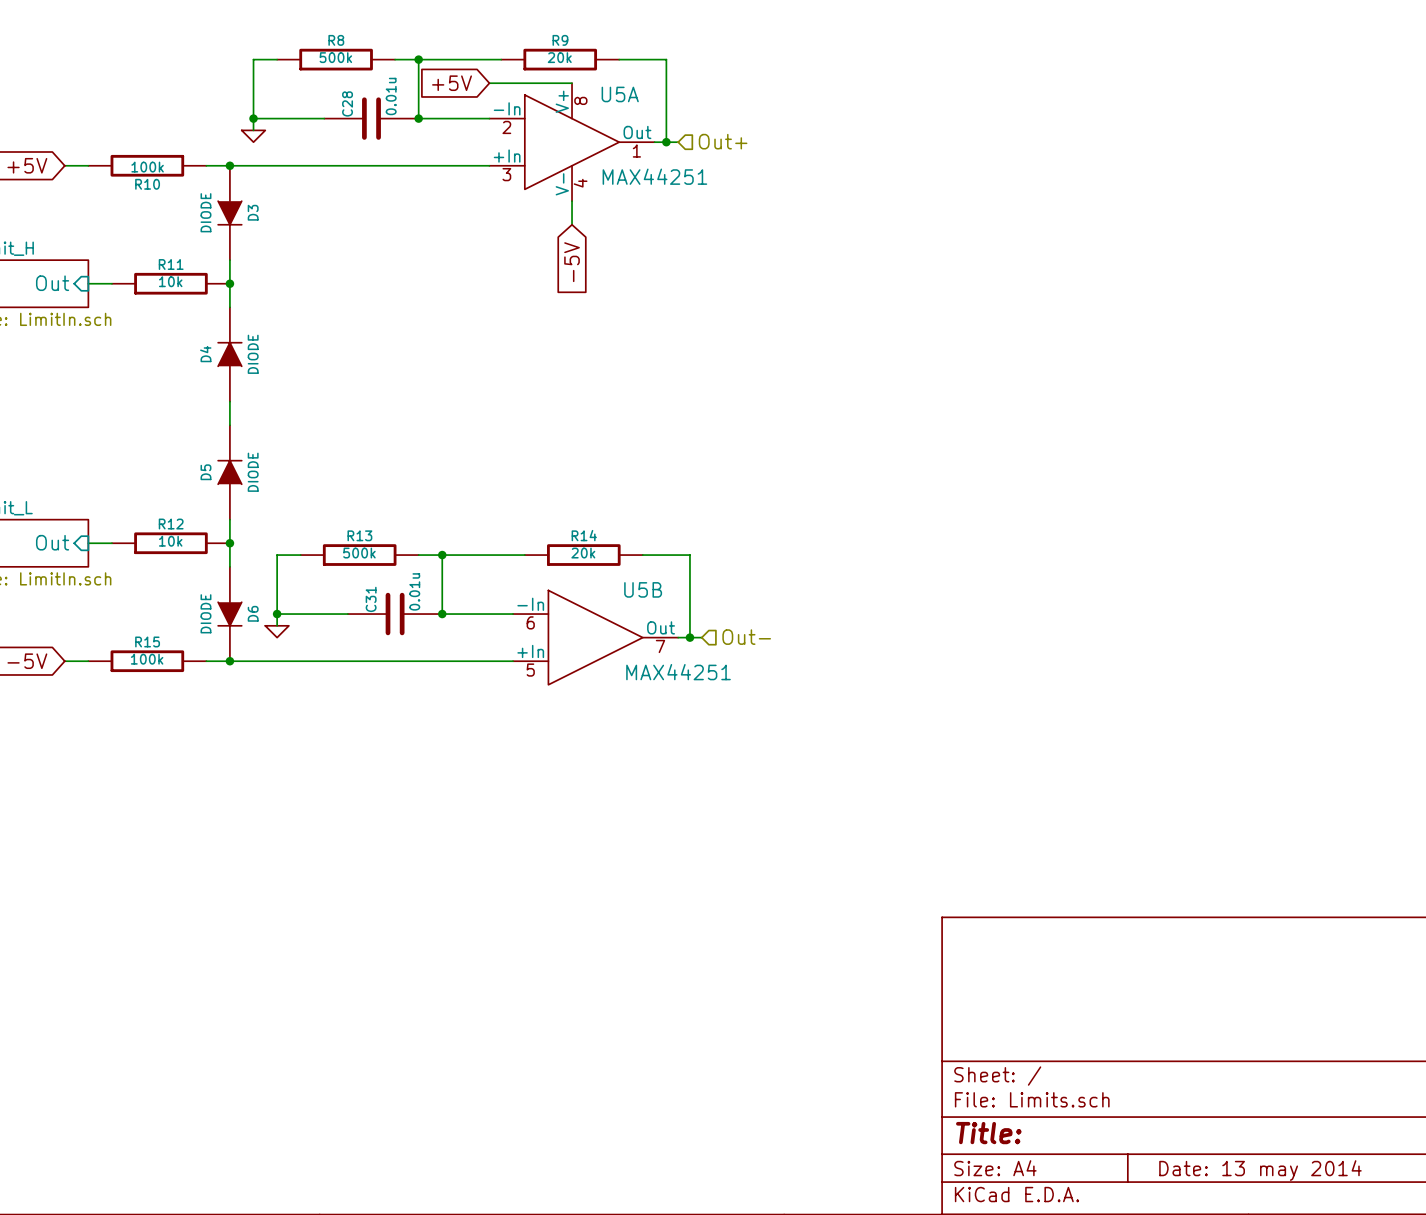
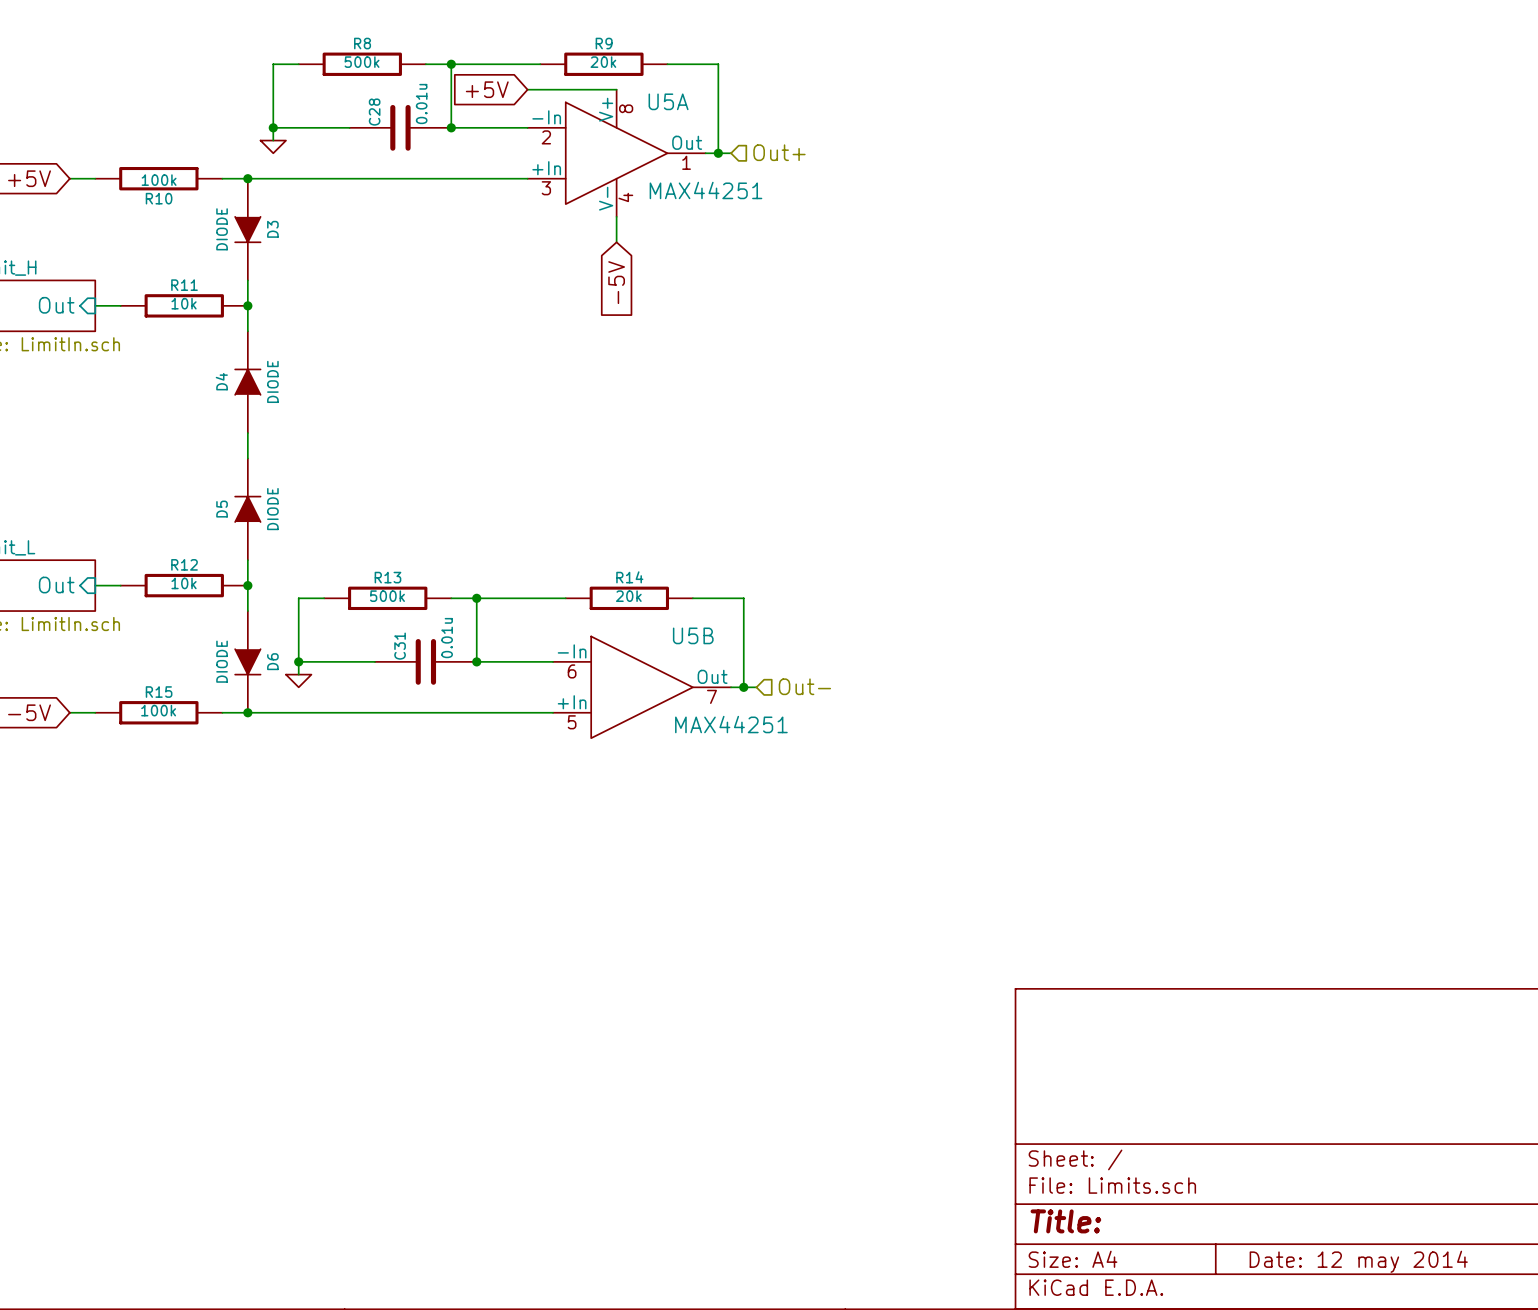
title block: Date: 13 may 2014 (1260, 1170) -> Date: 12 may 2014 (1358, 1261)

